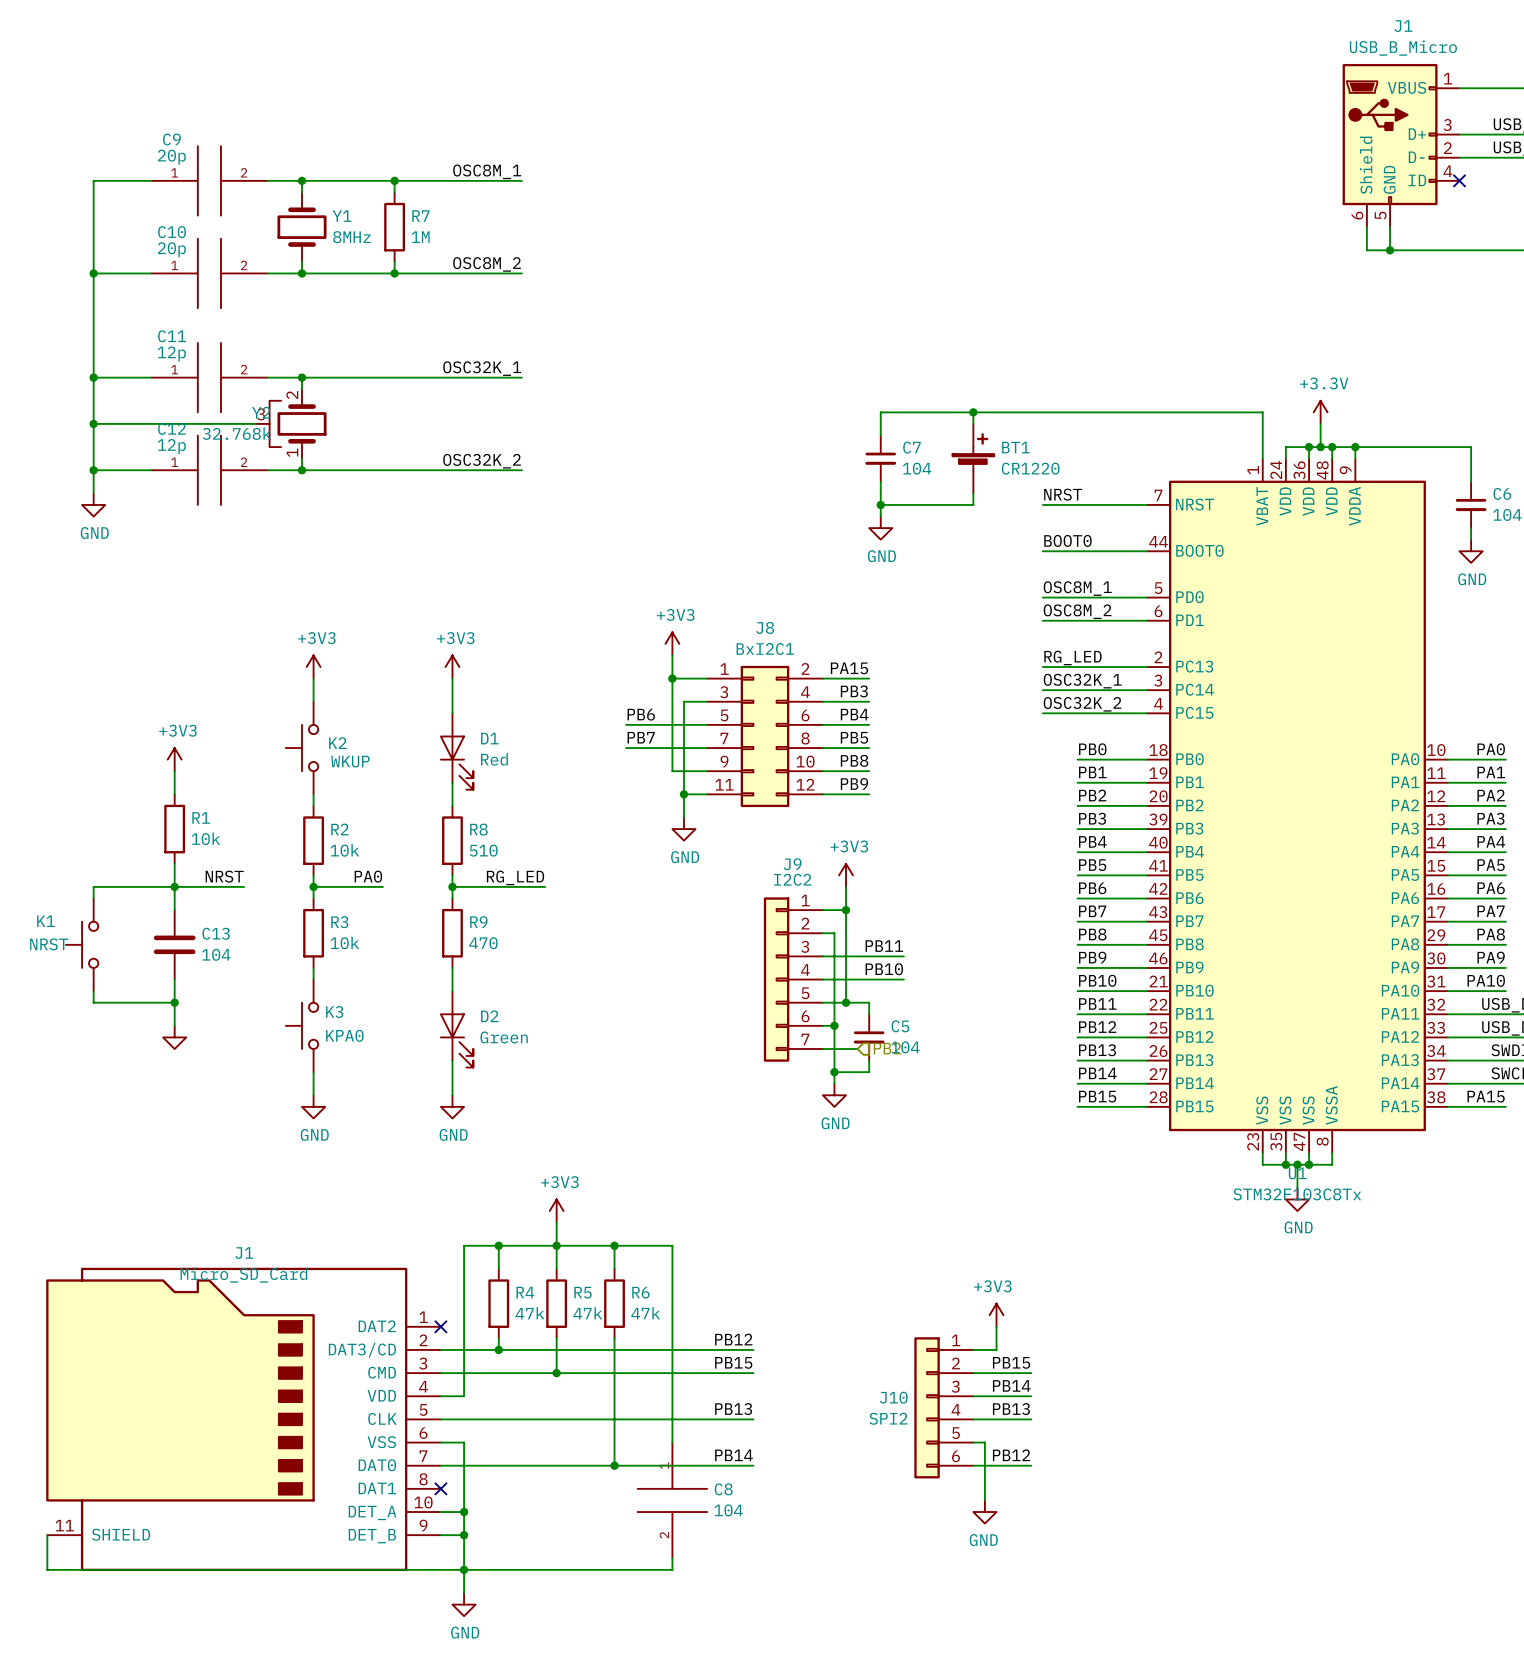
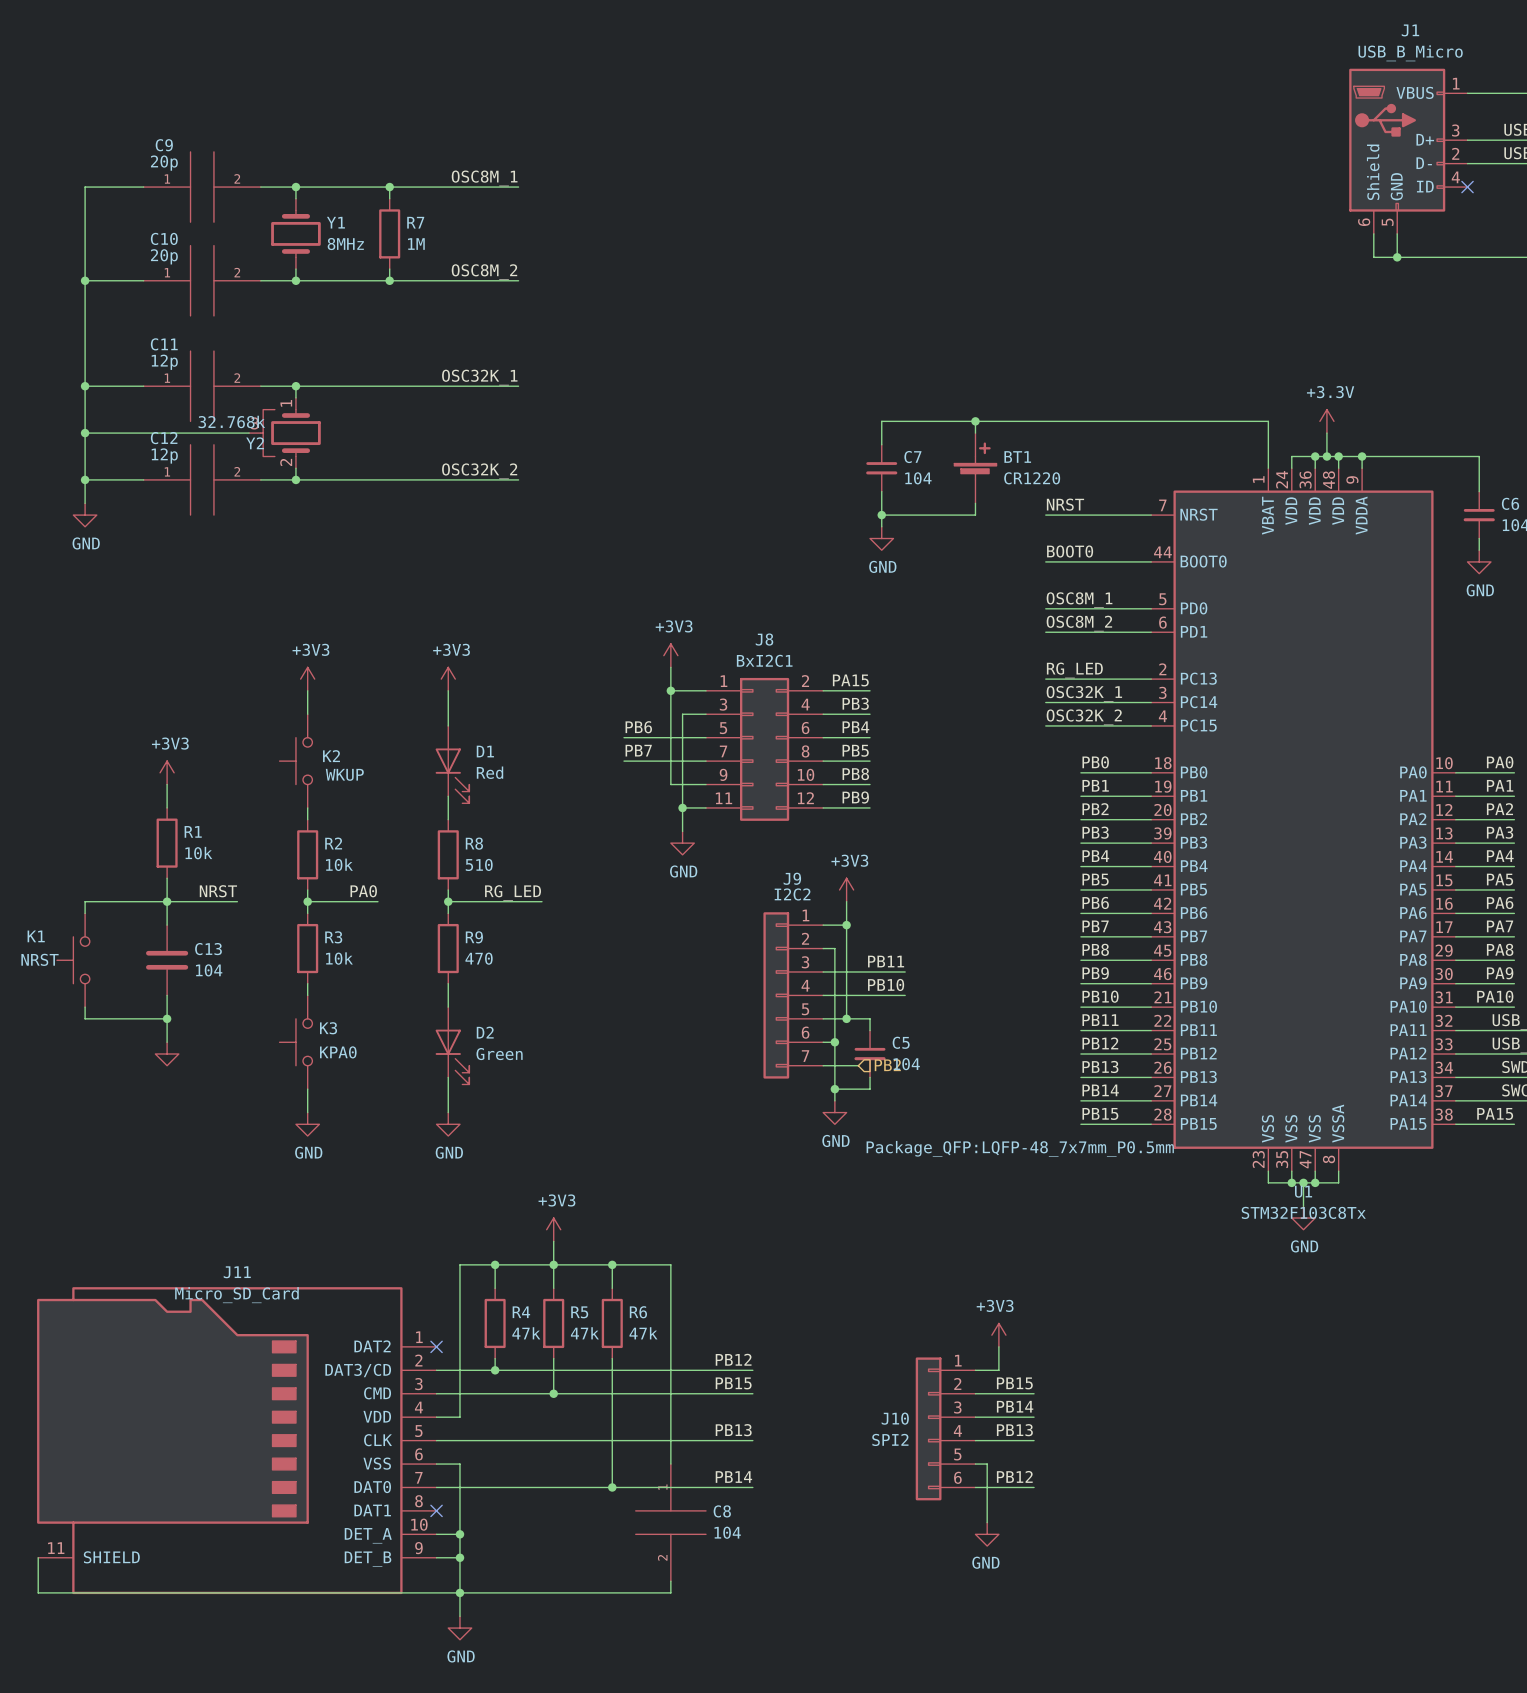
Y2 flip: as is (296, 423) -> up-down (290, 433)
U1 text: none -> Package_QFP:LQFP-48_7x7mm_P0.5mm (1020, 1148)
J1 name: J1 (244, 1253) -> J11 (237, 1272)

